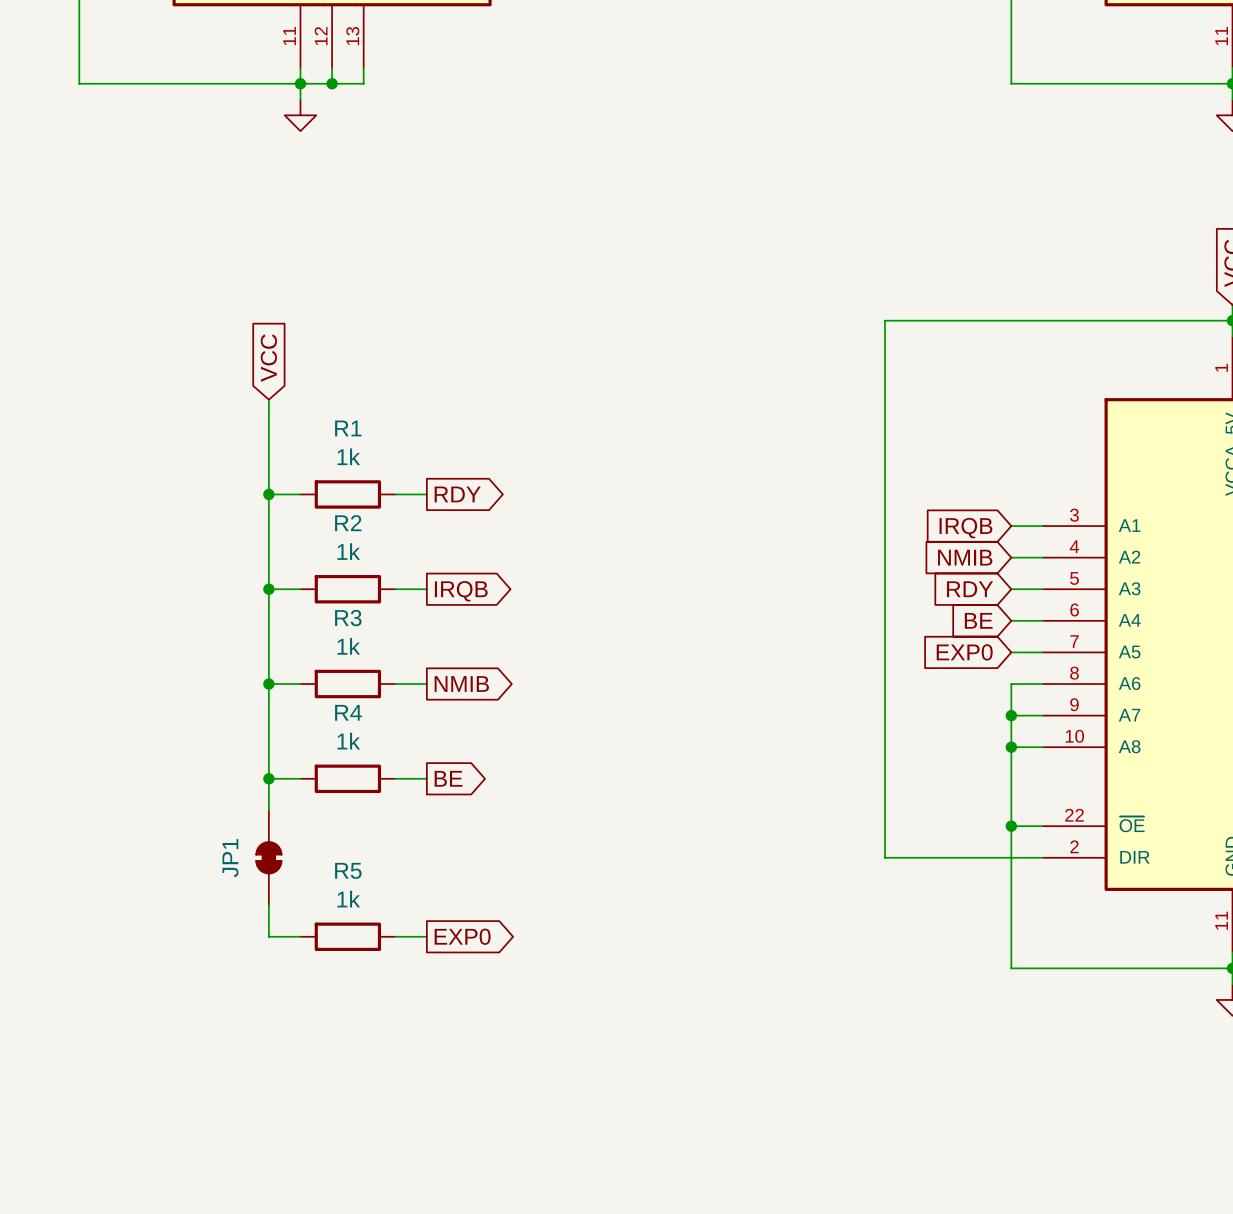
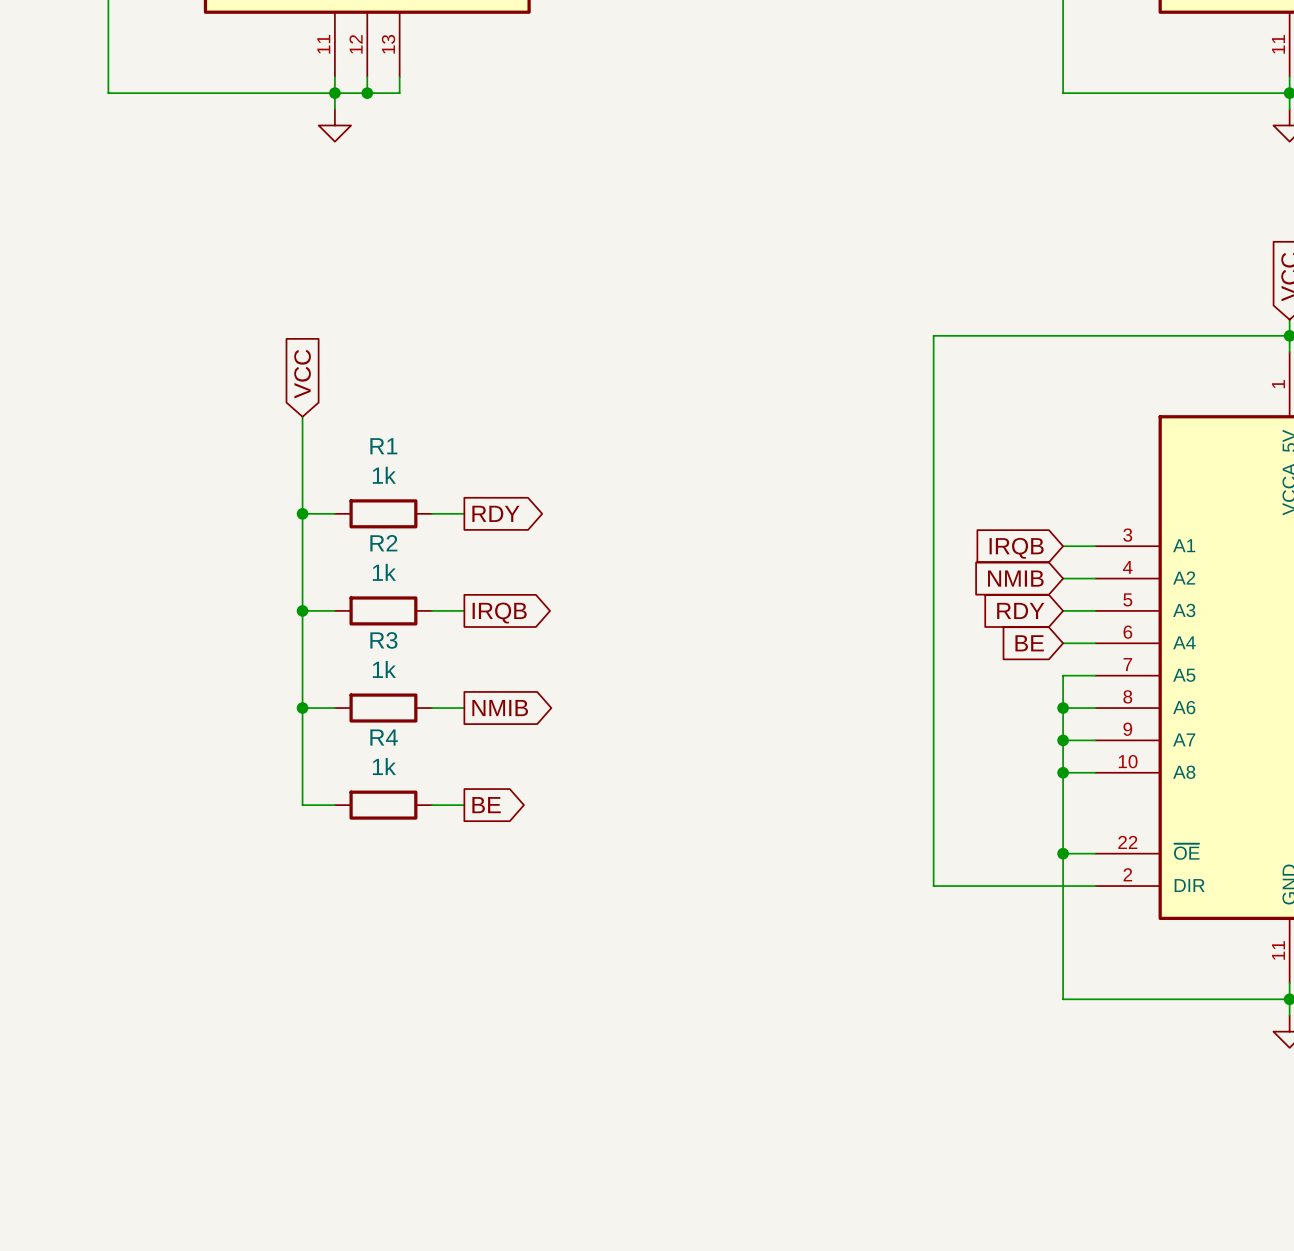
global label: EXP0 (964, 652) -> none
wire: none -> (1063, 675) (1063, 708)
junction: none -> (1063, 708)
wire: (268, 778) (268, 810) -> none
junction: (268, 778) -> none
JP1: (268, 857) -> none
wire: (268, 905) (268, 936) (300, 936) -> none
R5: 1k (347, 936) -> none
wire: (395, 936) (426, 936) -> none
global label: EXP0 (462, 936) -> none

